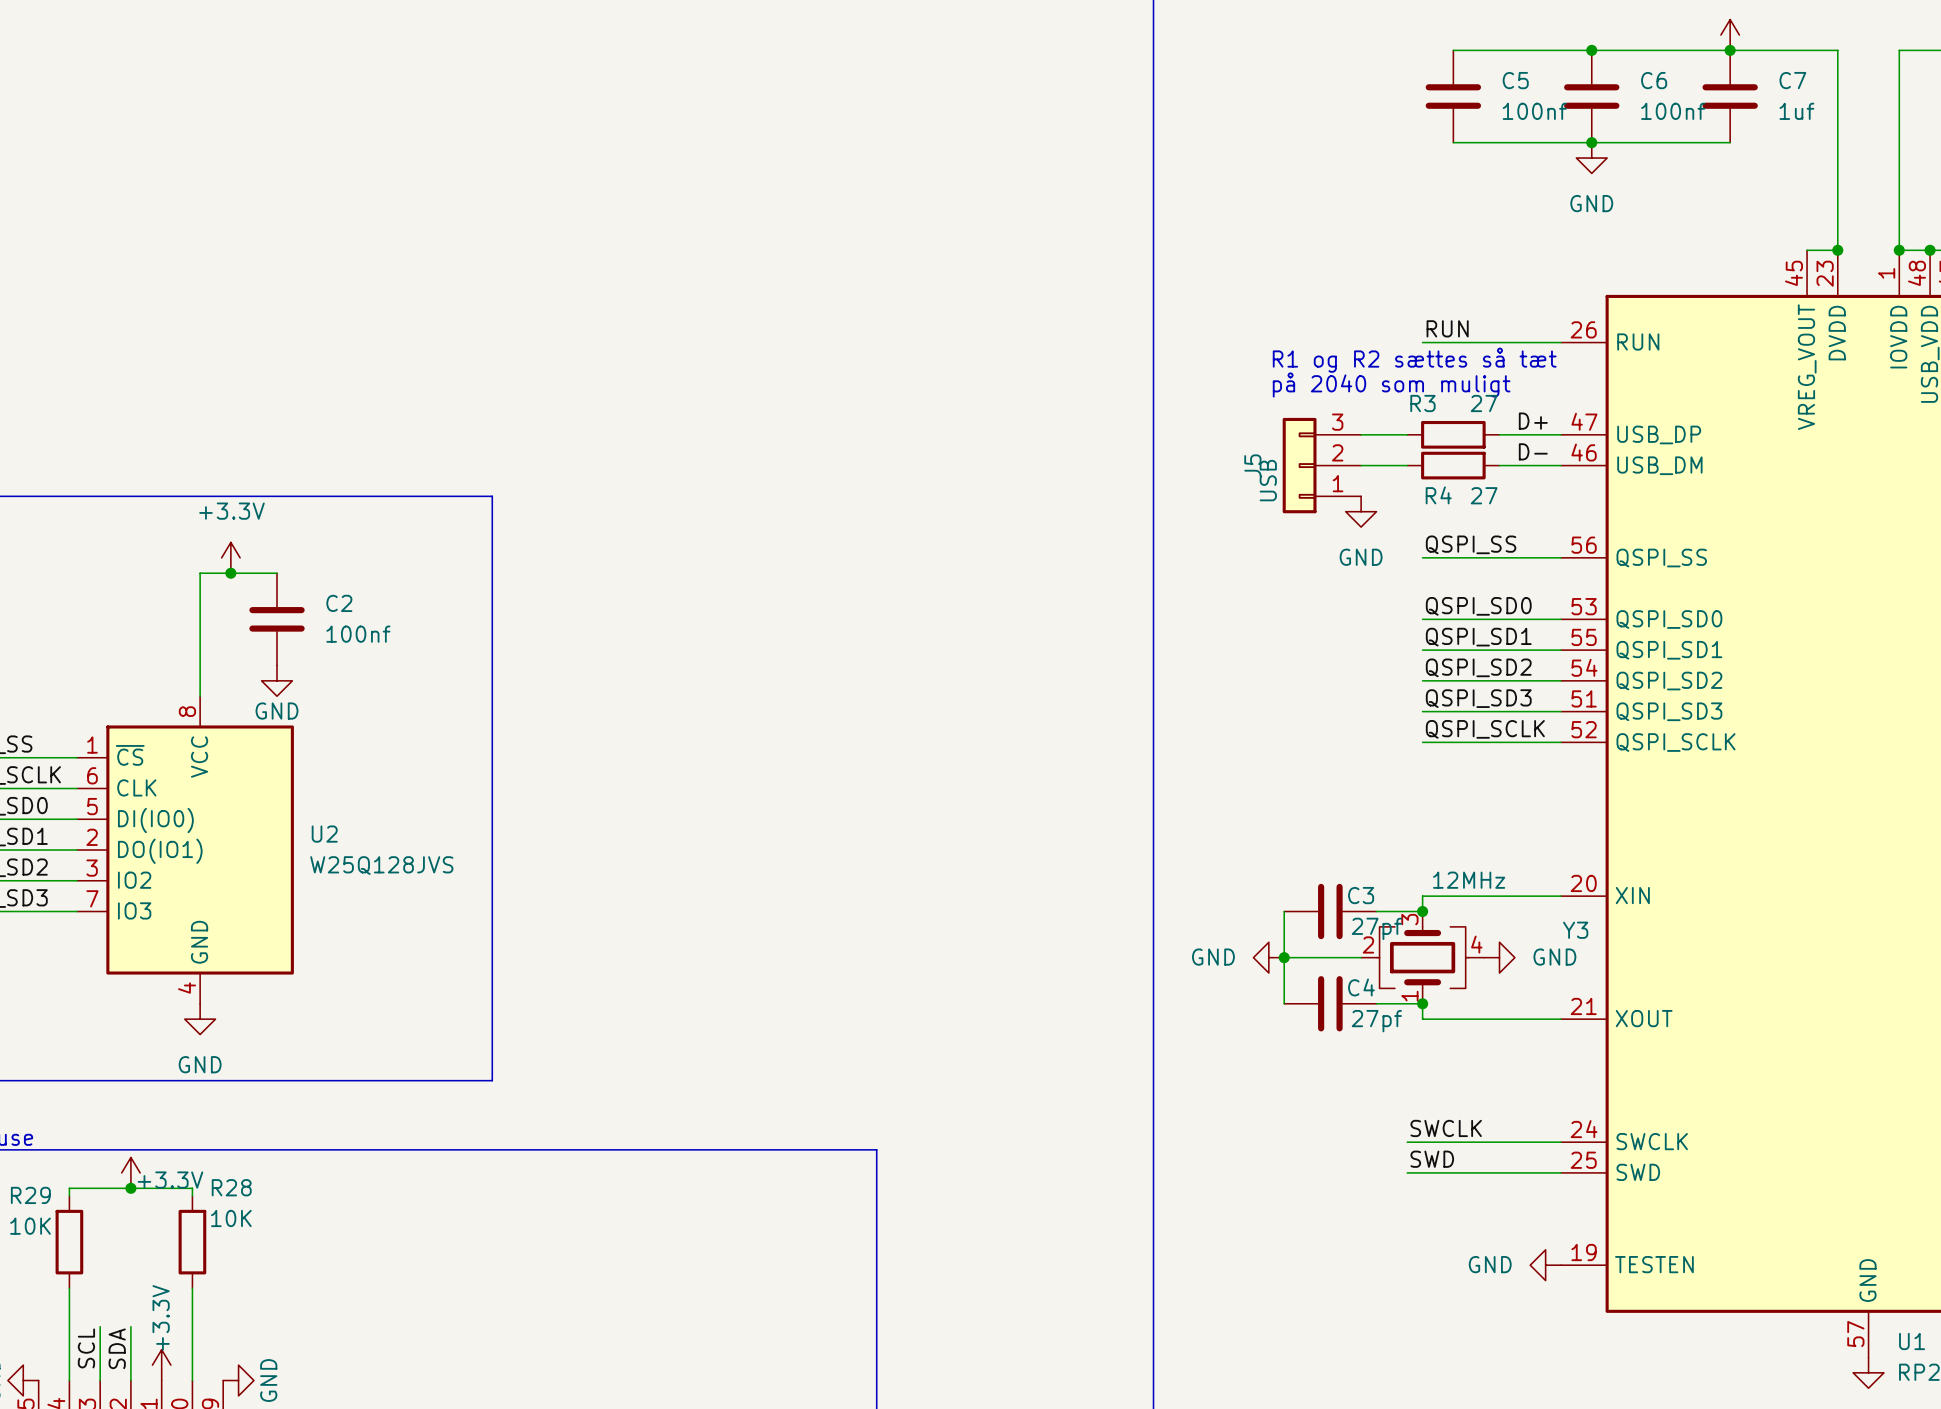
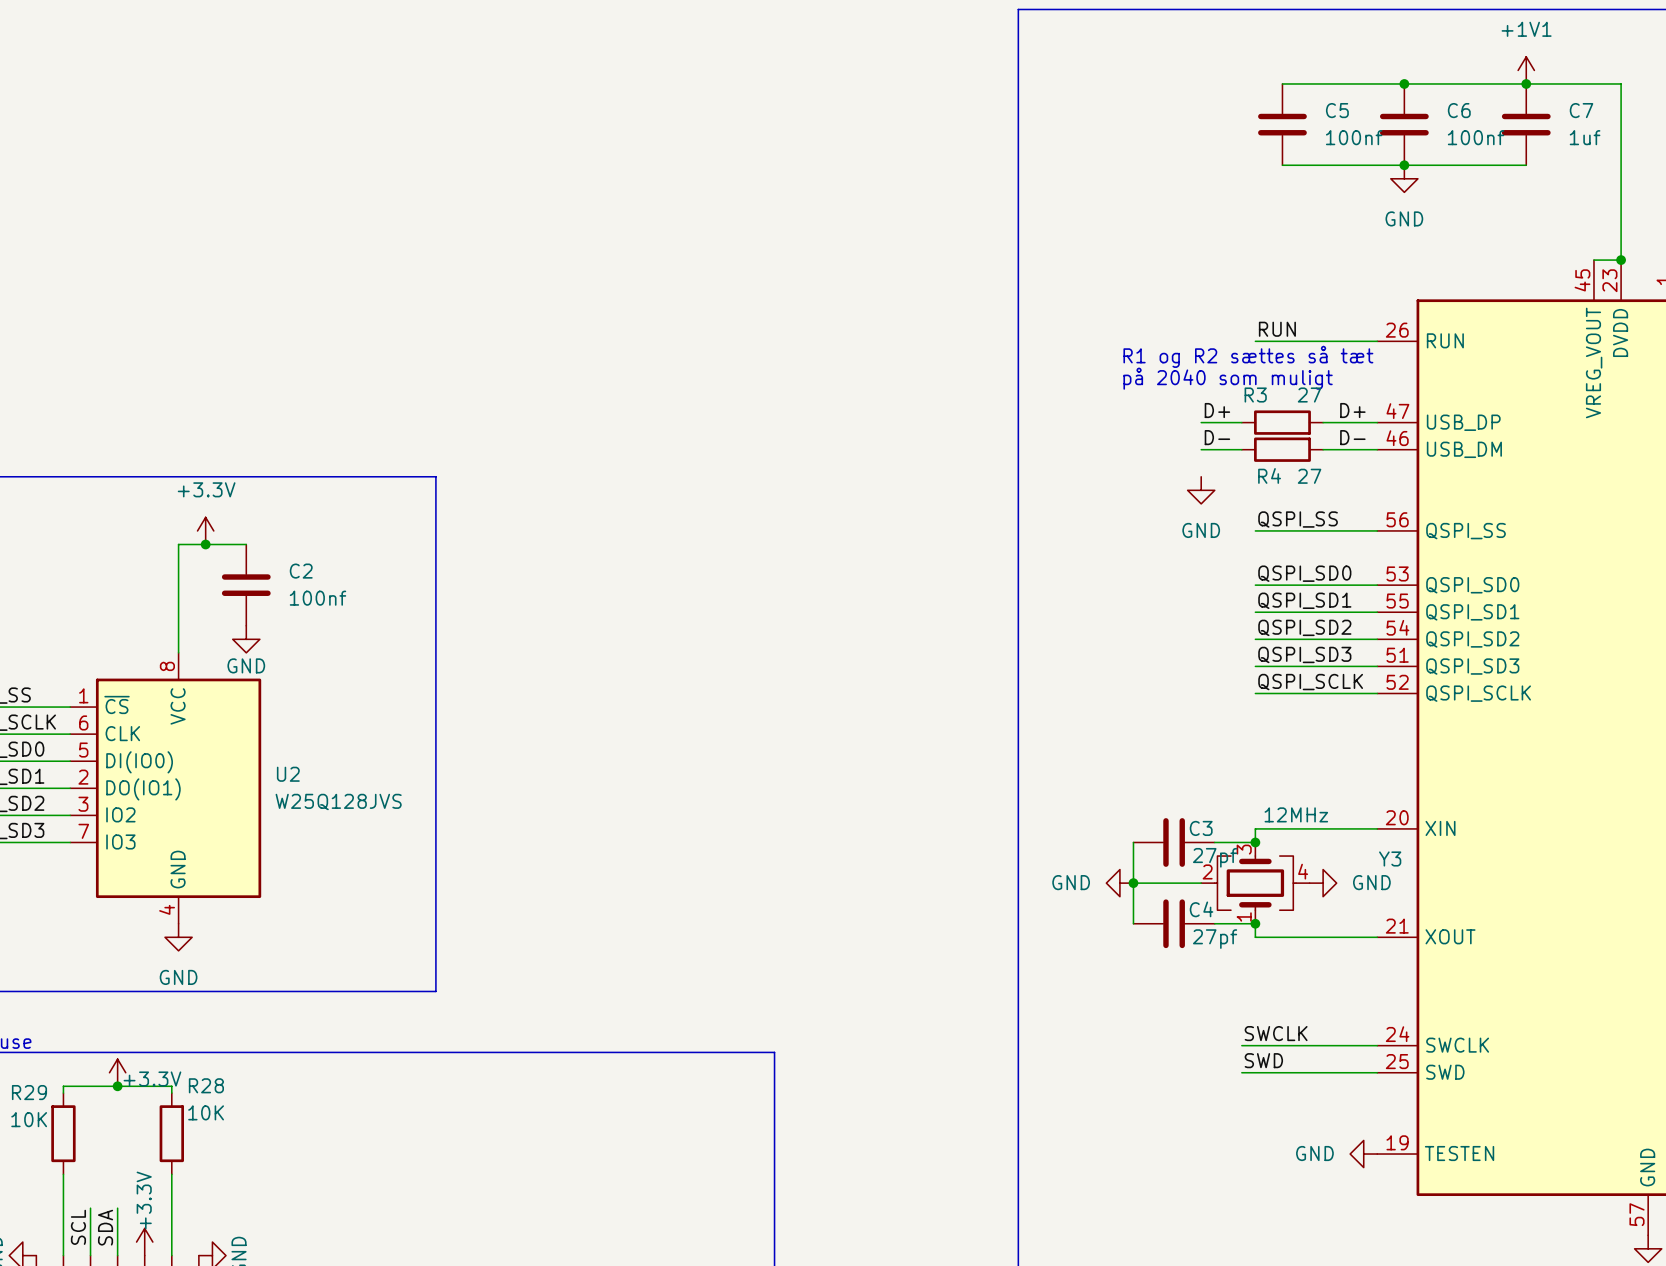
label: none -> D+ (1217, 410)
label: none -> D- (1217, 437)
J5: USB (1321, 465) -> none

